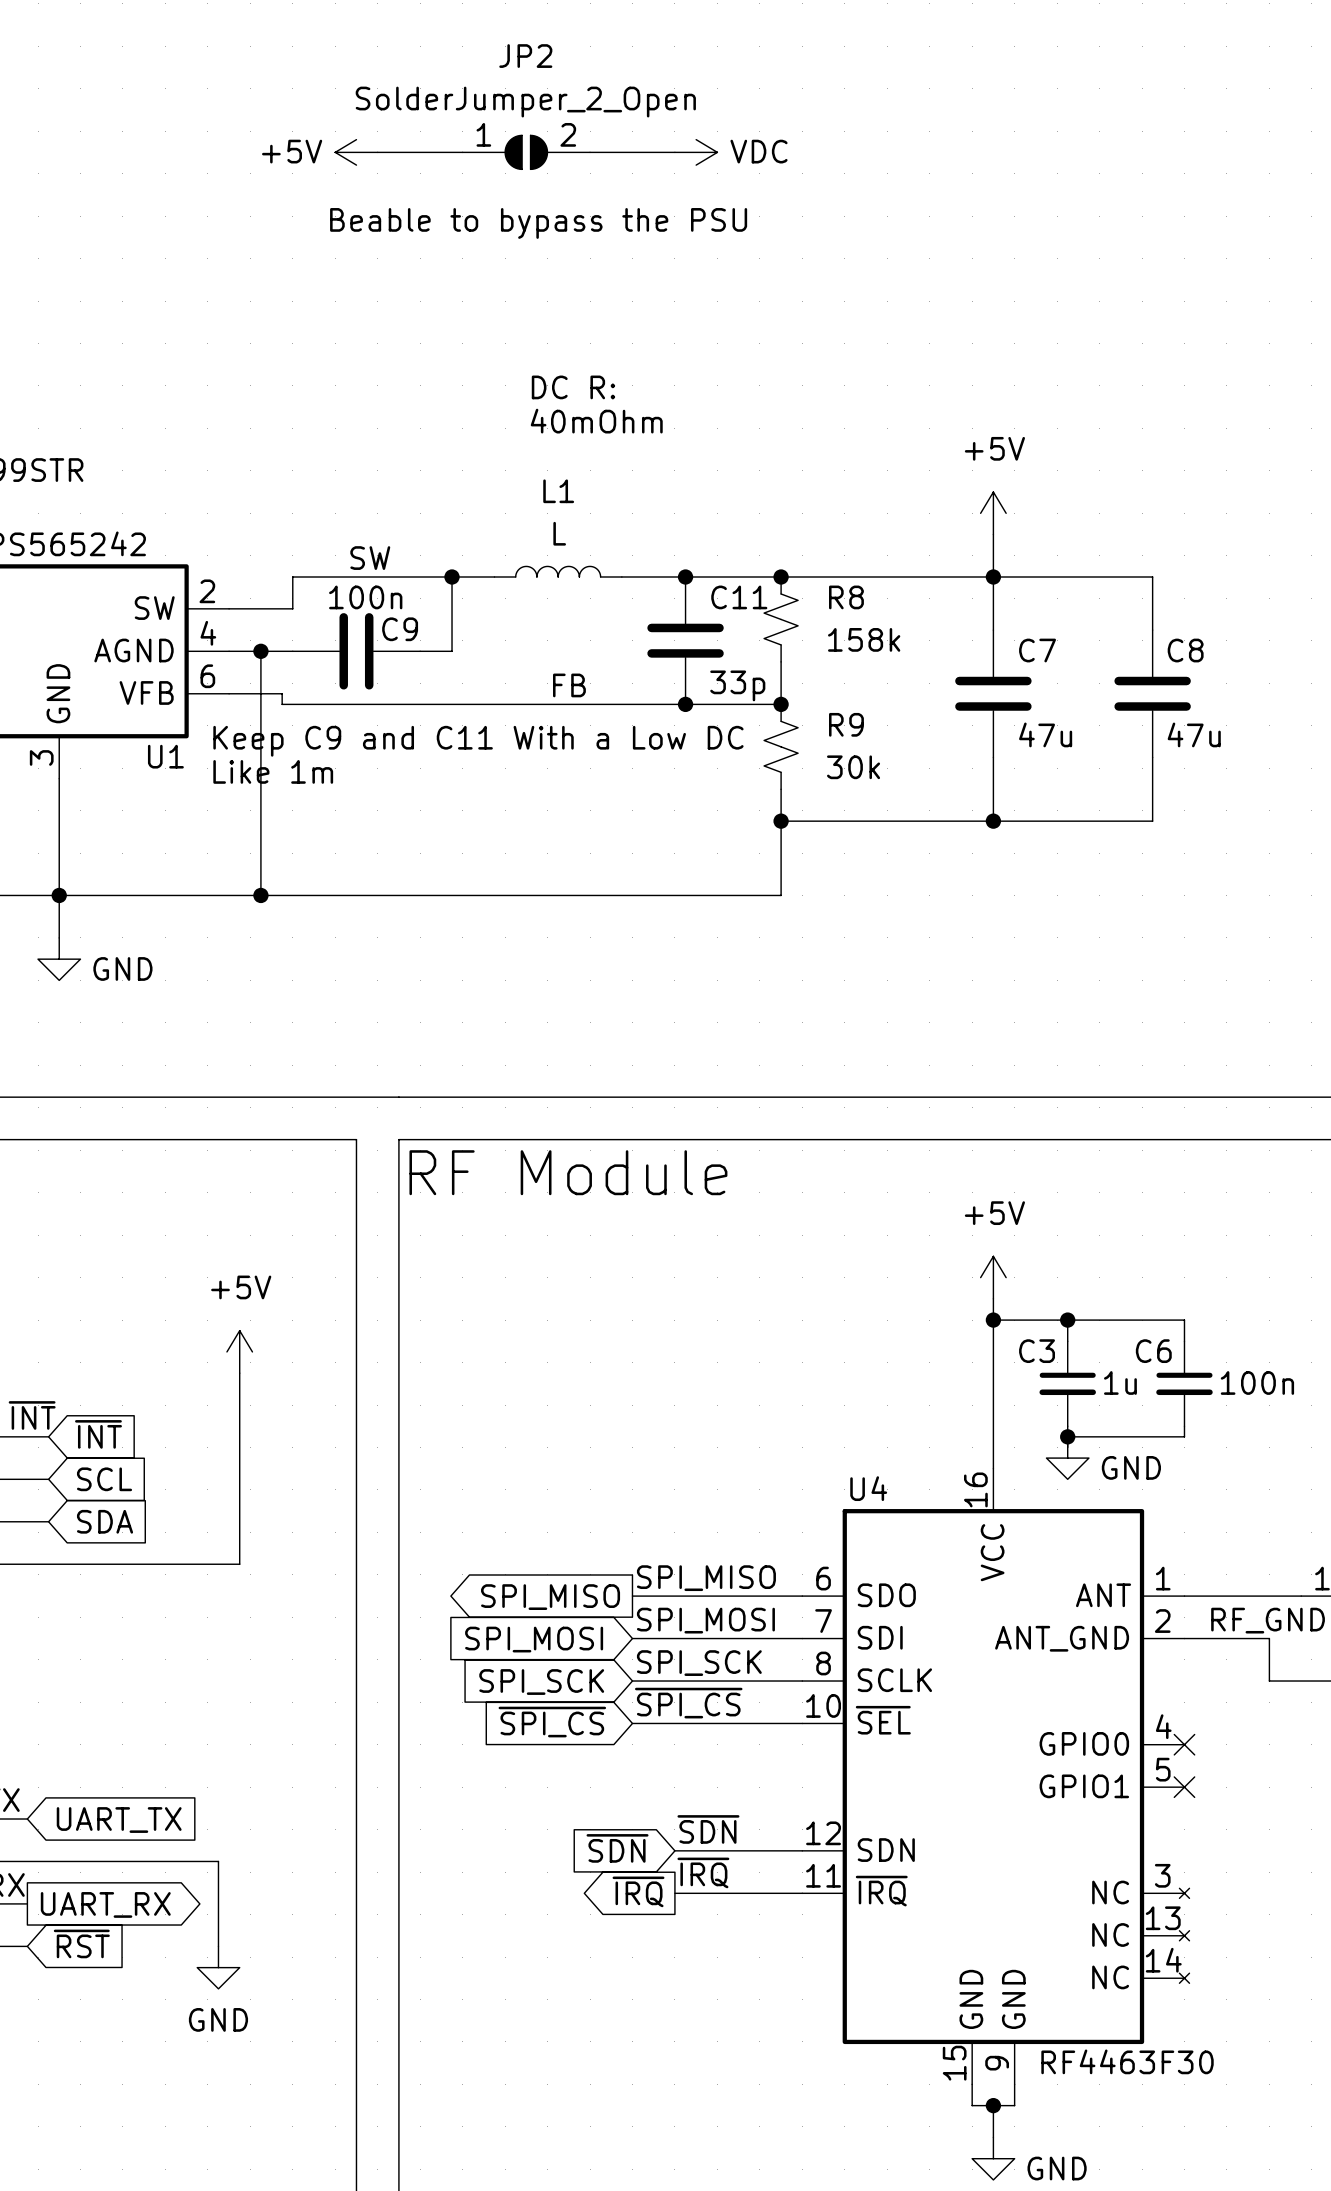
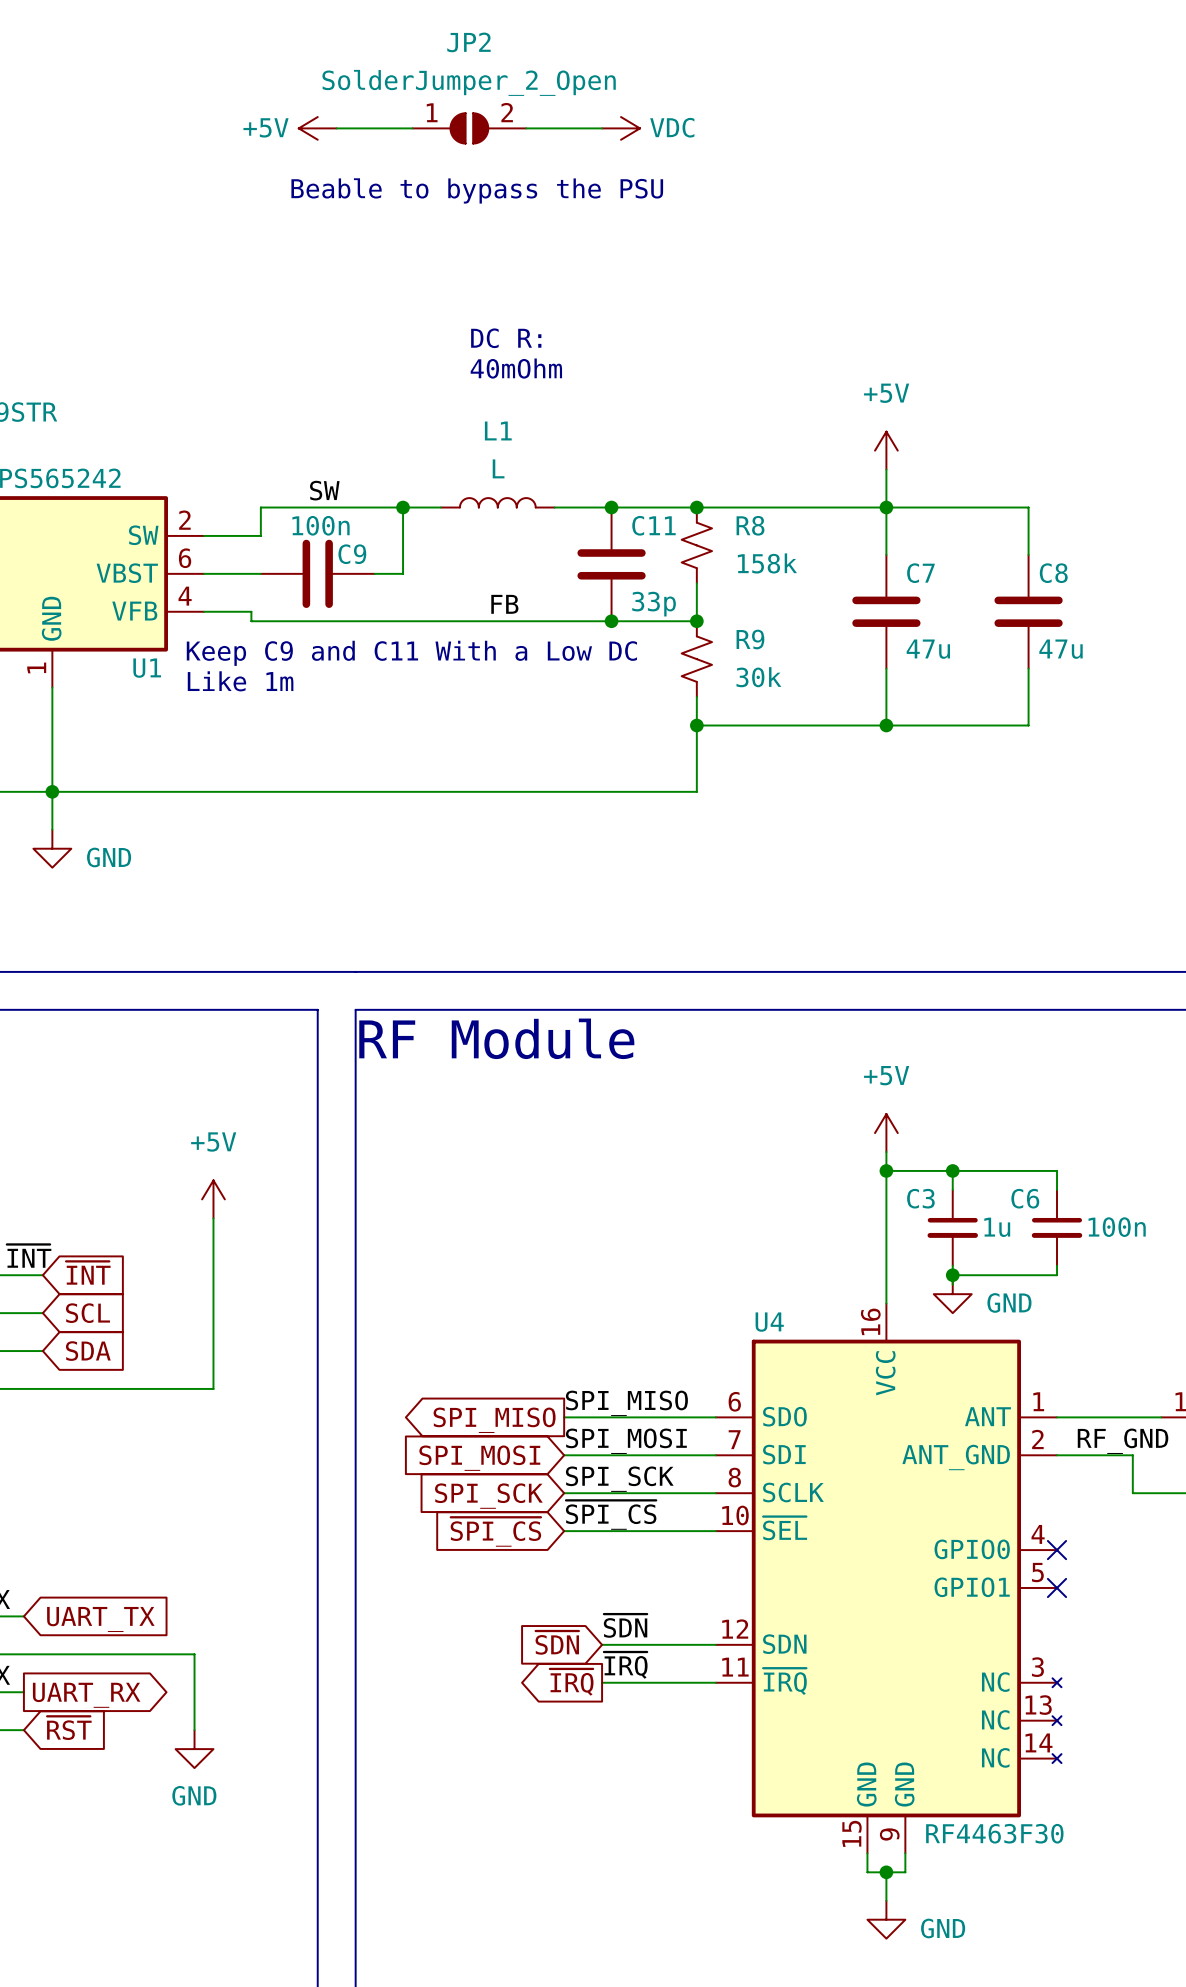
U1 pin number: 4 (208, 633) -> 6 (185, 558)
U1 pin name: AGND (133, 650) -> VBST (127, 573)
wire: (260, 651) (260, 895) -> none
junction: (260, 651) -> none
U1 pin number: 6 (207, 676) -> 4 (185, 596)
U1 pin number: 3 (41, 757) -> 1 (36, 667)
junction: (260, 895) -> none

